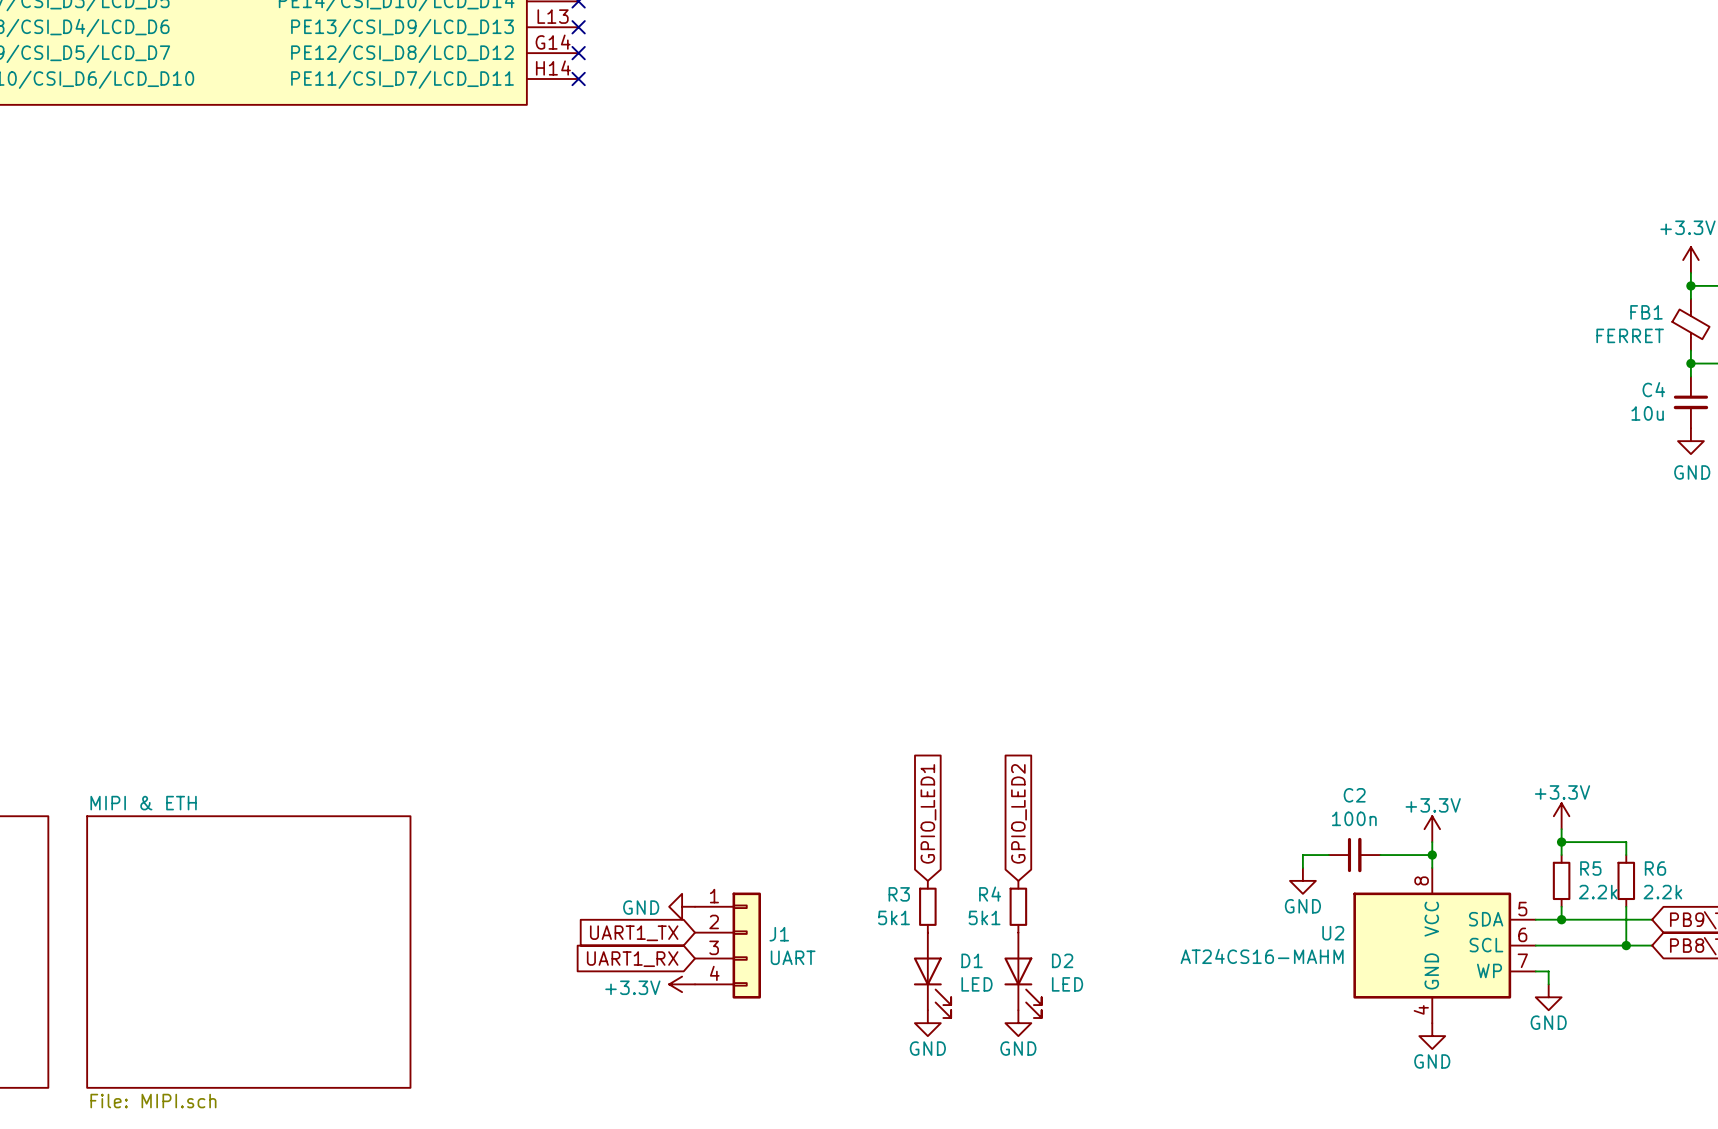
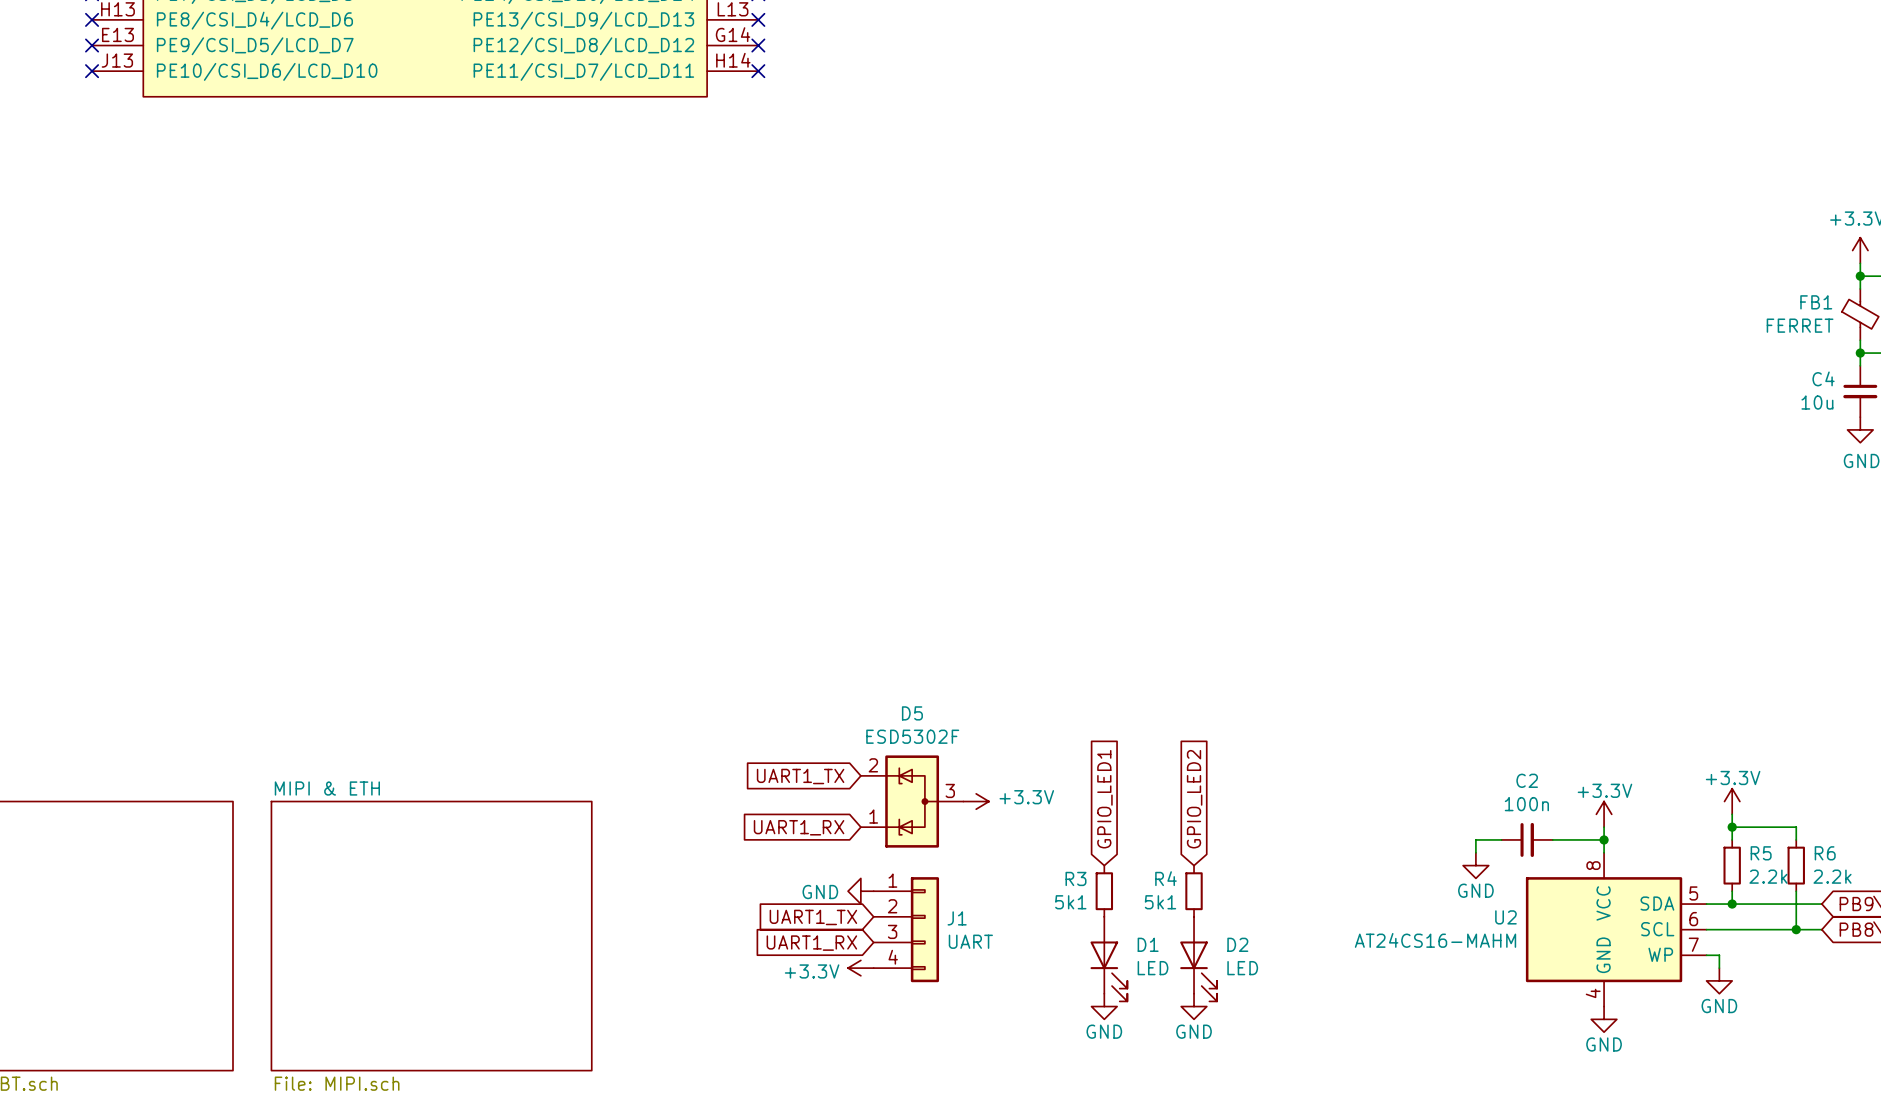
global label: none -> UART1_TX (800, 776)
D5: none -> ESD5302F (912, 801)
power symbol: none -> +3.3V (976, 801)
global label: none -> UART1_RX (799, 827)

